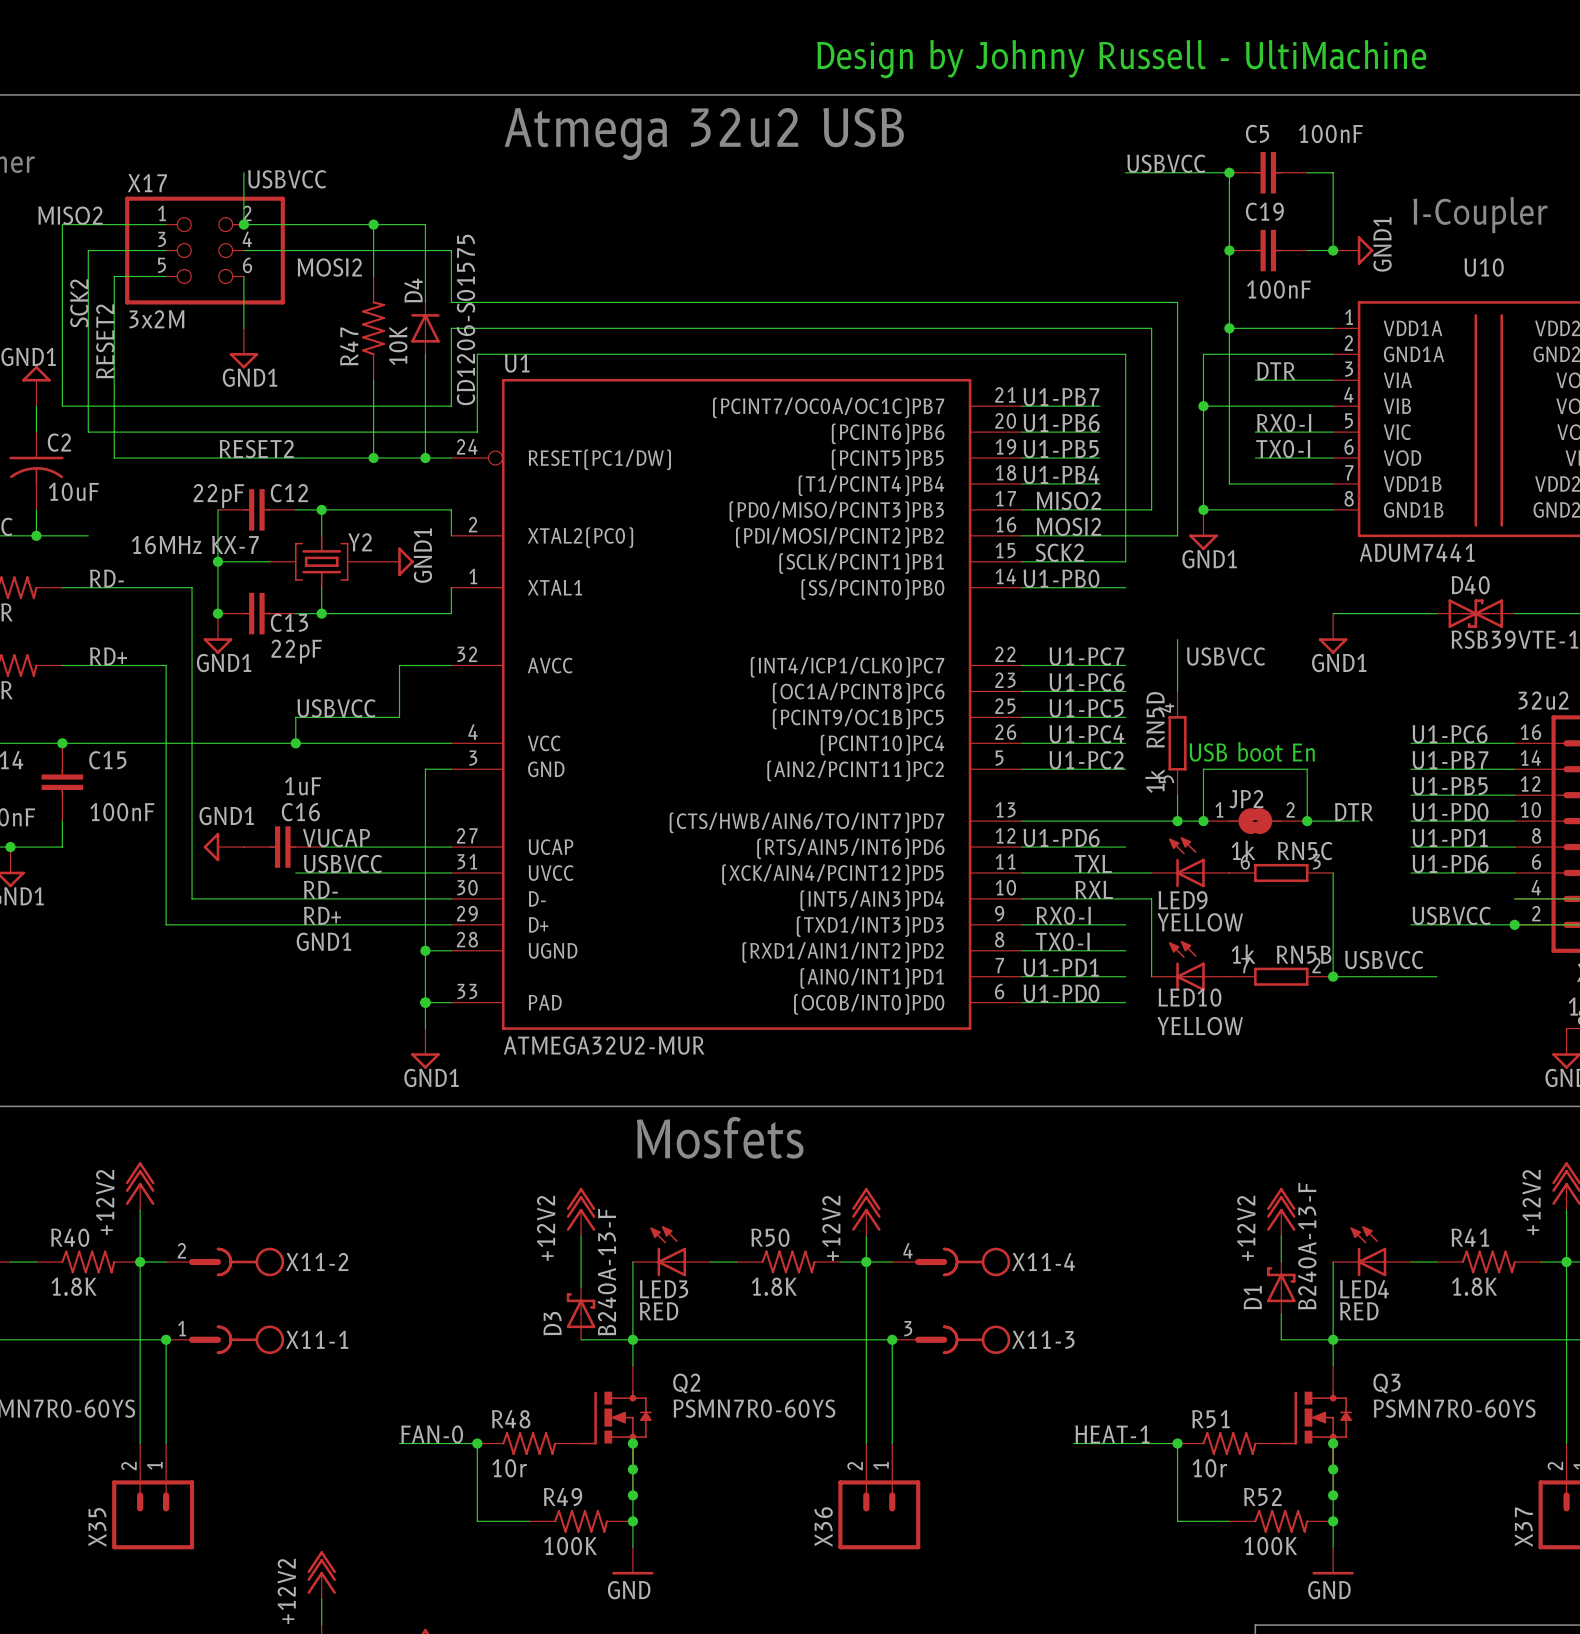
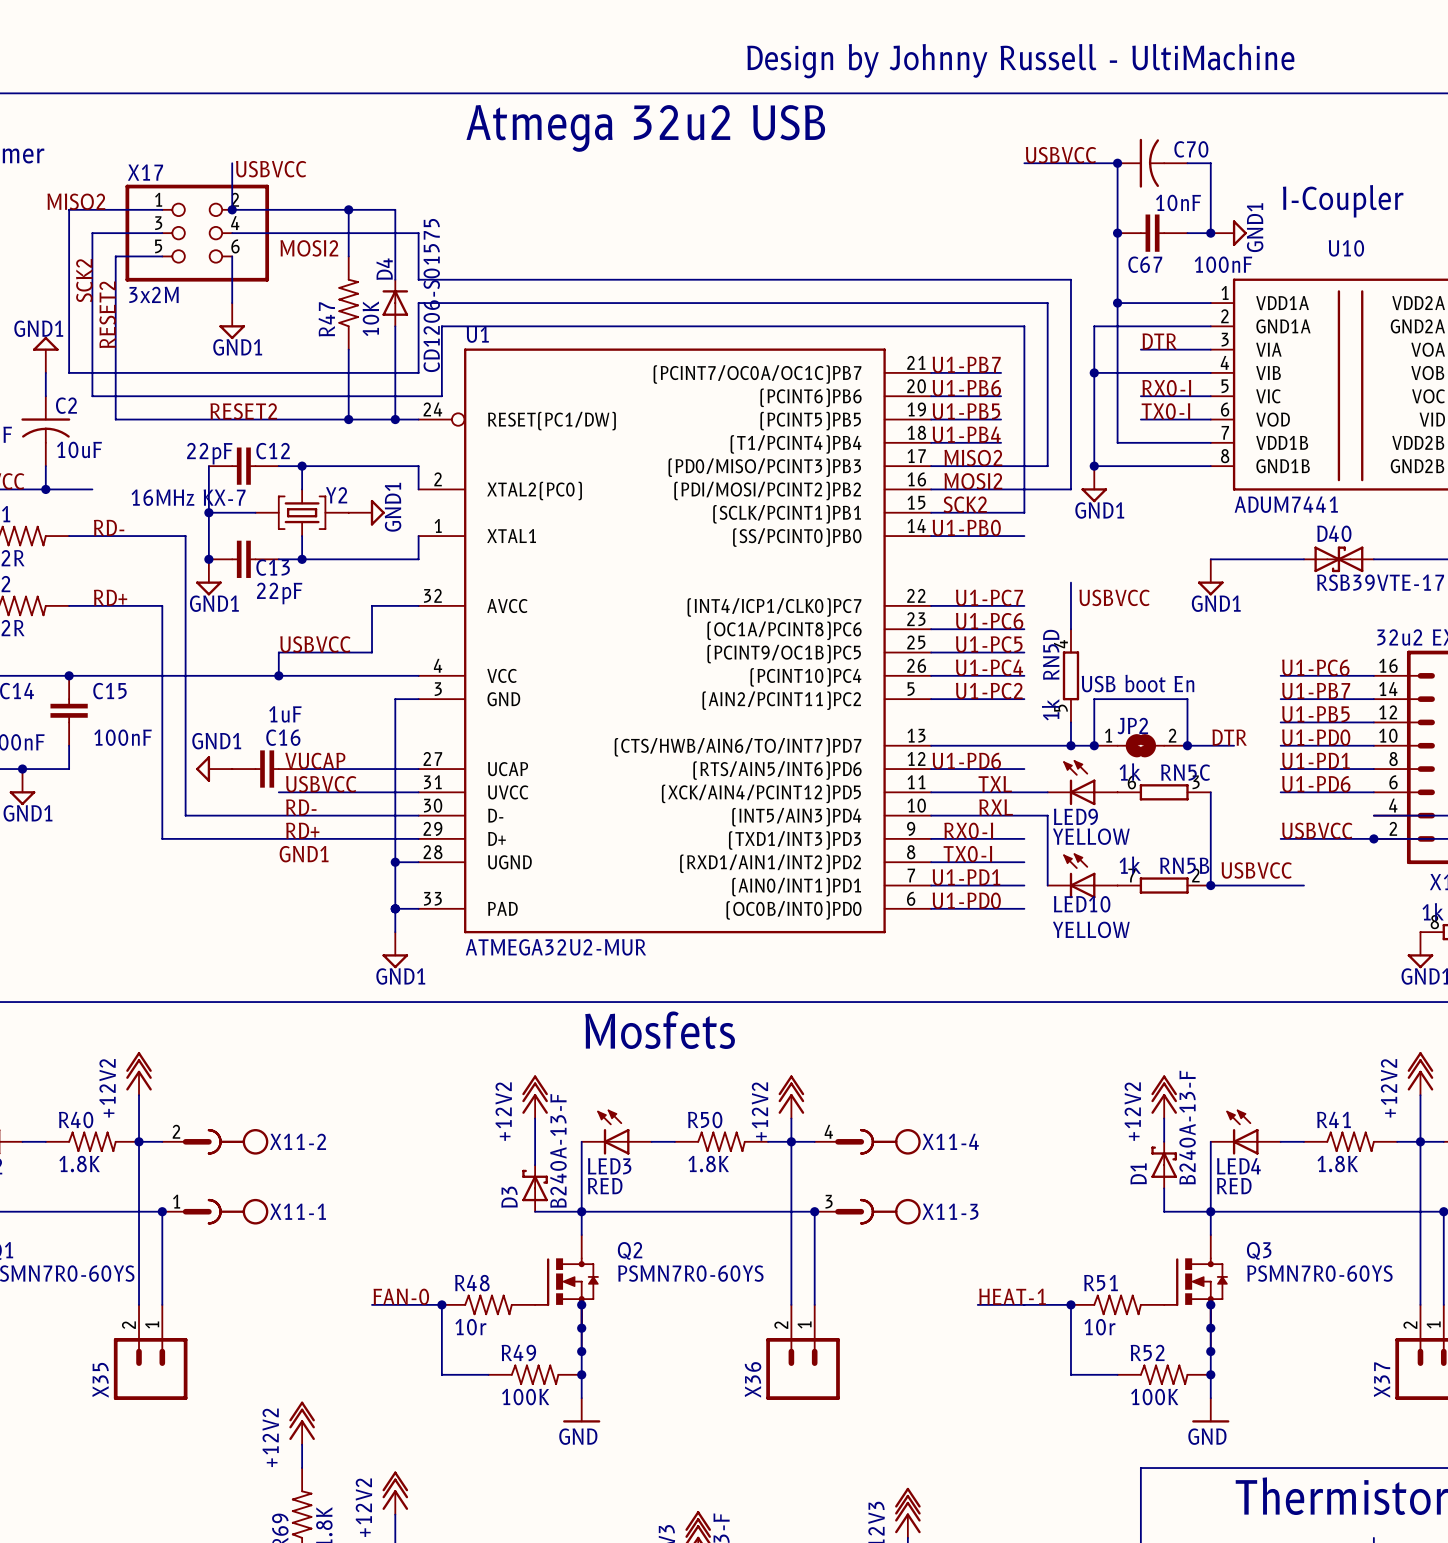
C5: 100nF (1268, 172) -> none
C70: none -> 10nF (1152, 163)
C19 name: C19 (1264, 211) -> C67 (1145, 264)
C19 value position: 100nF (1279, 289) -> 100nF (1223, 264)

